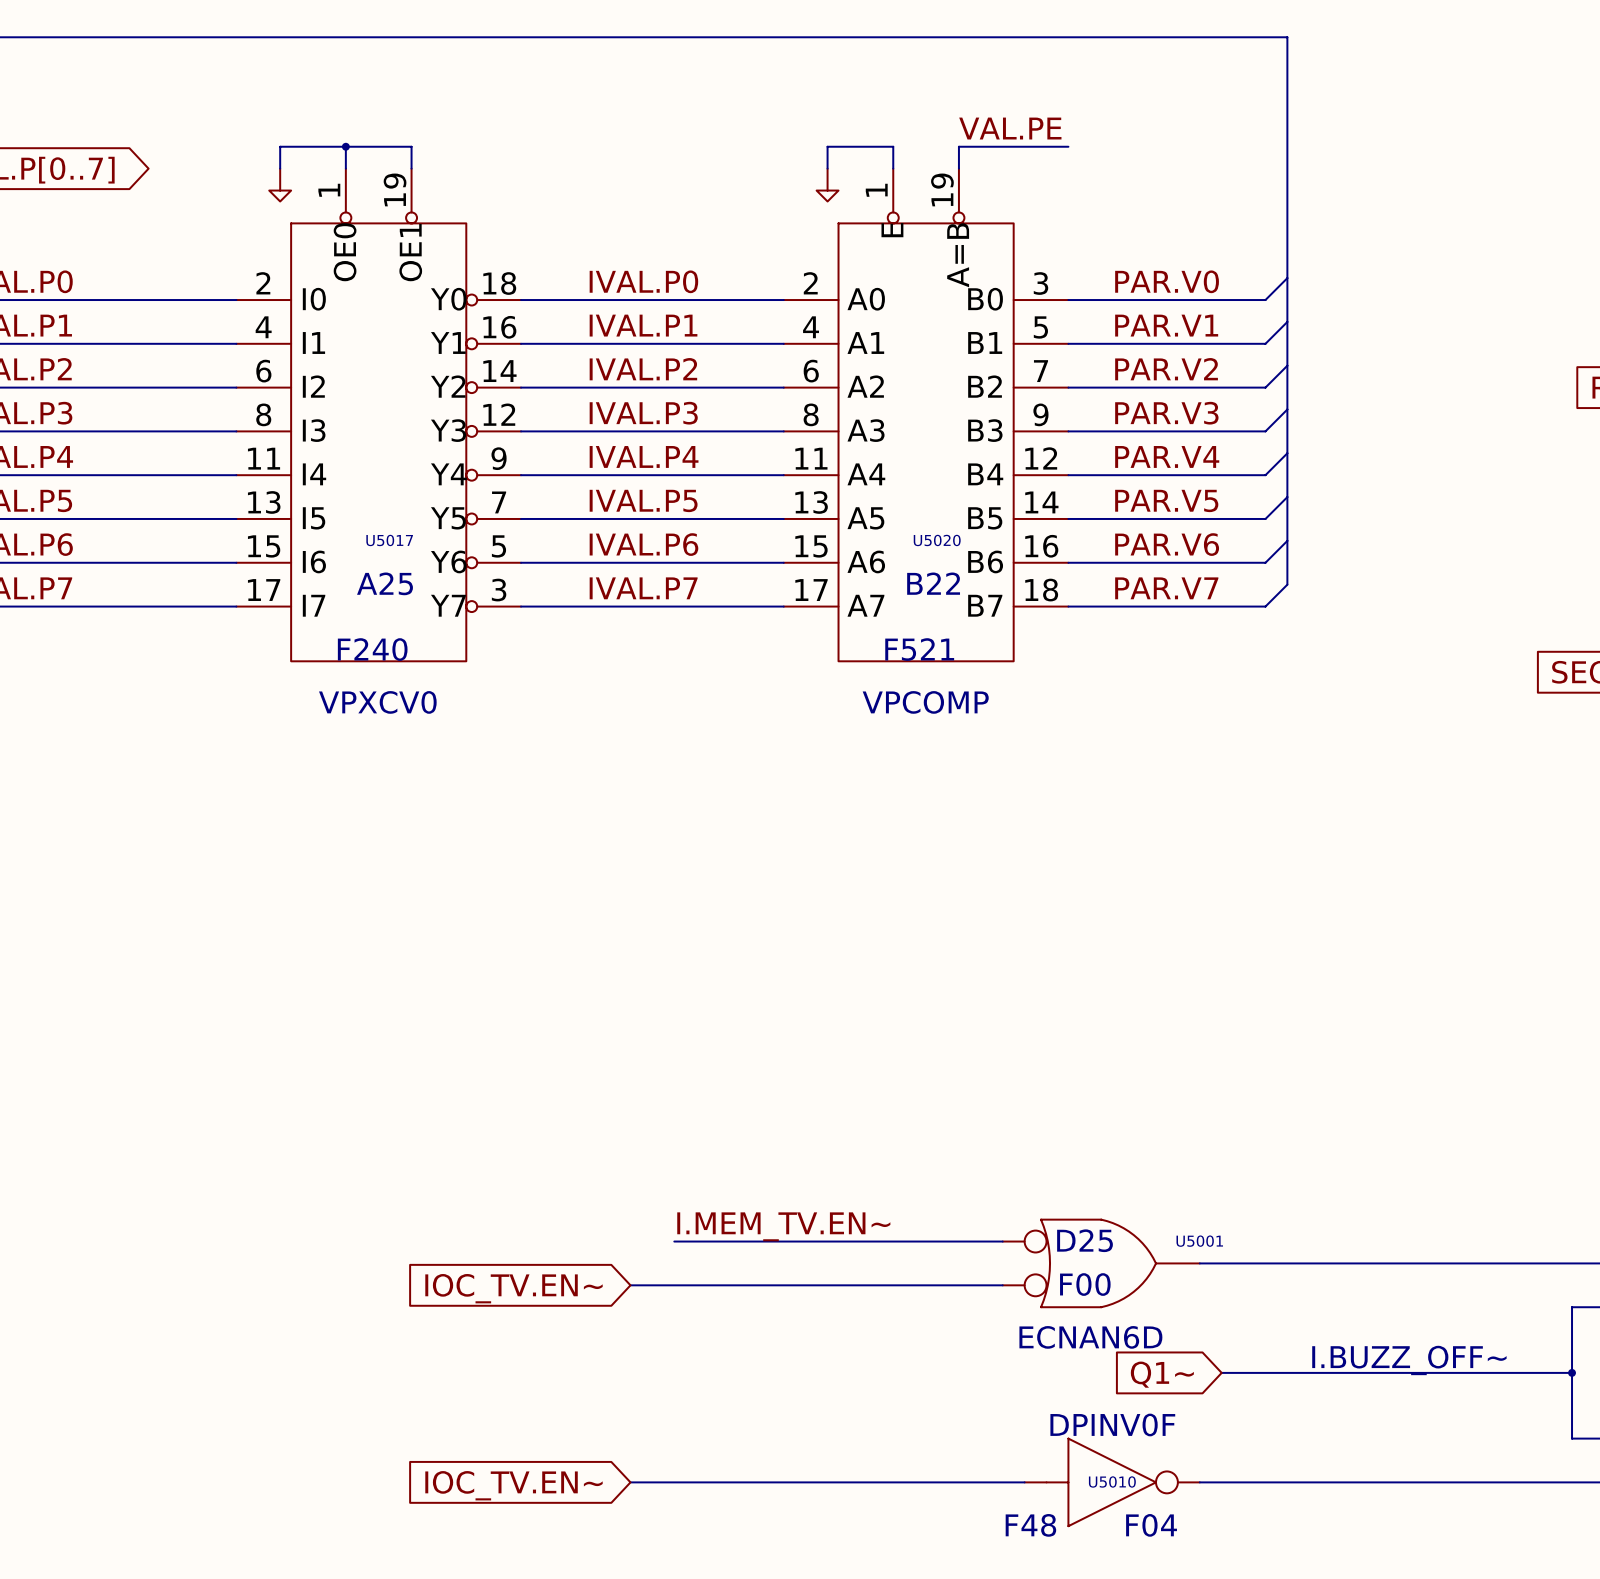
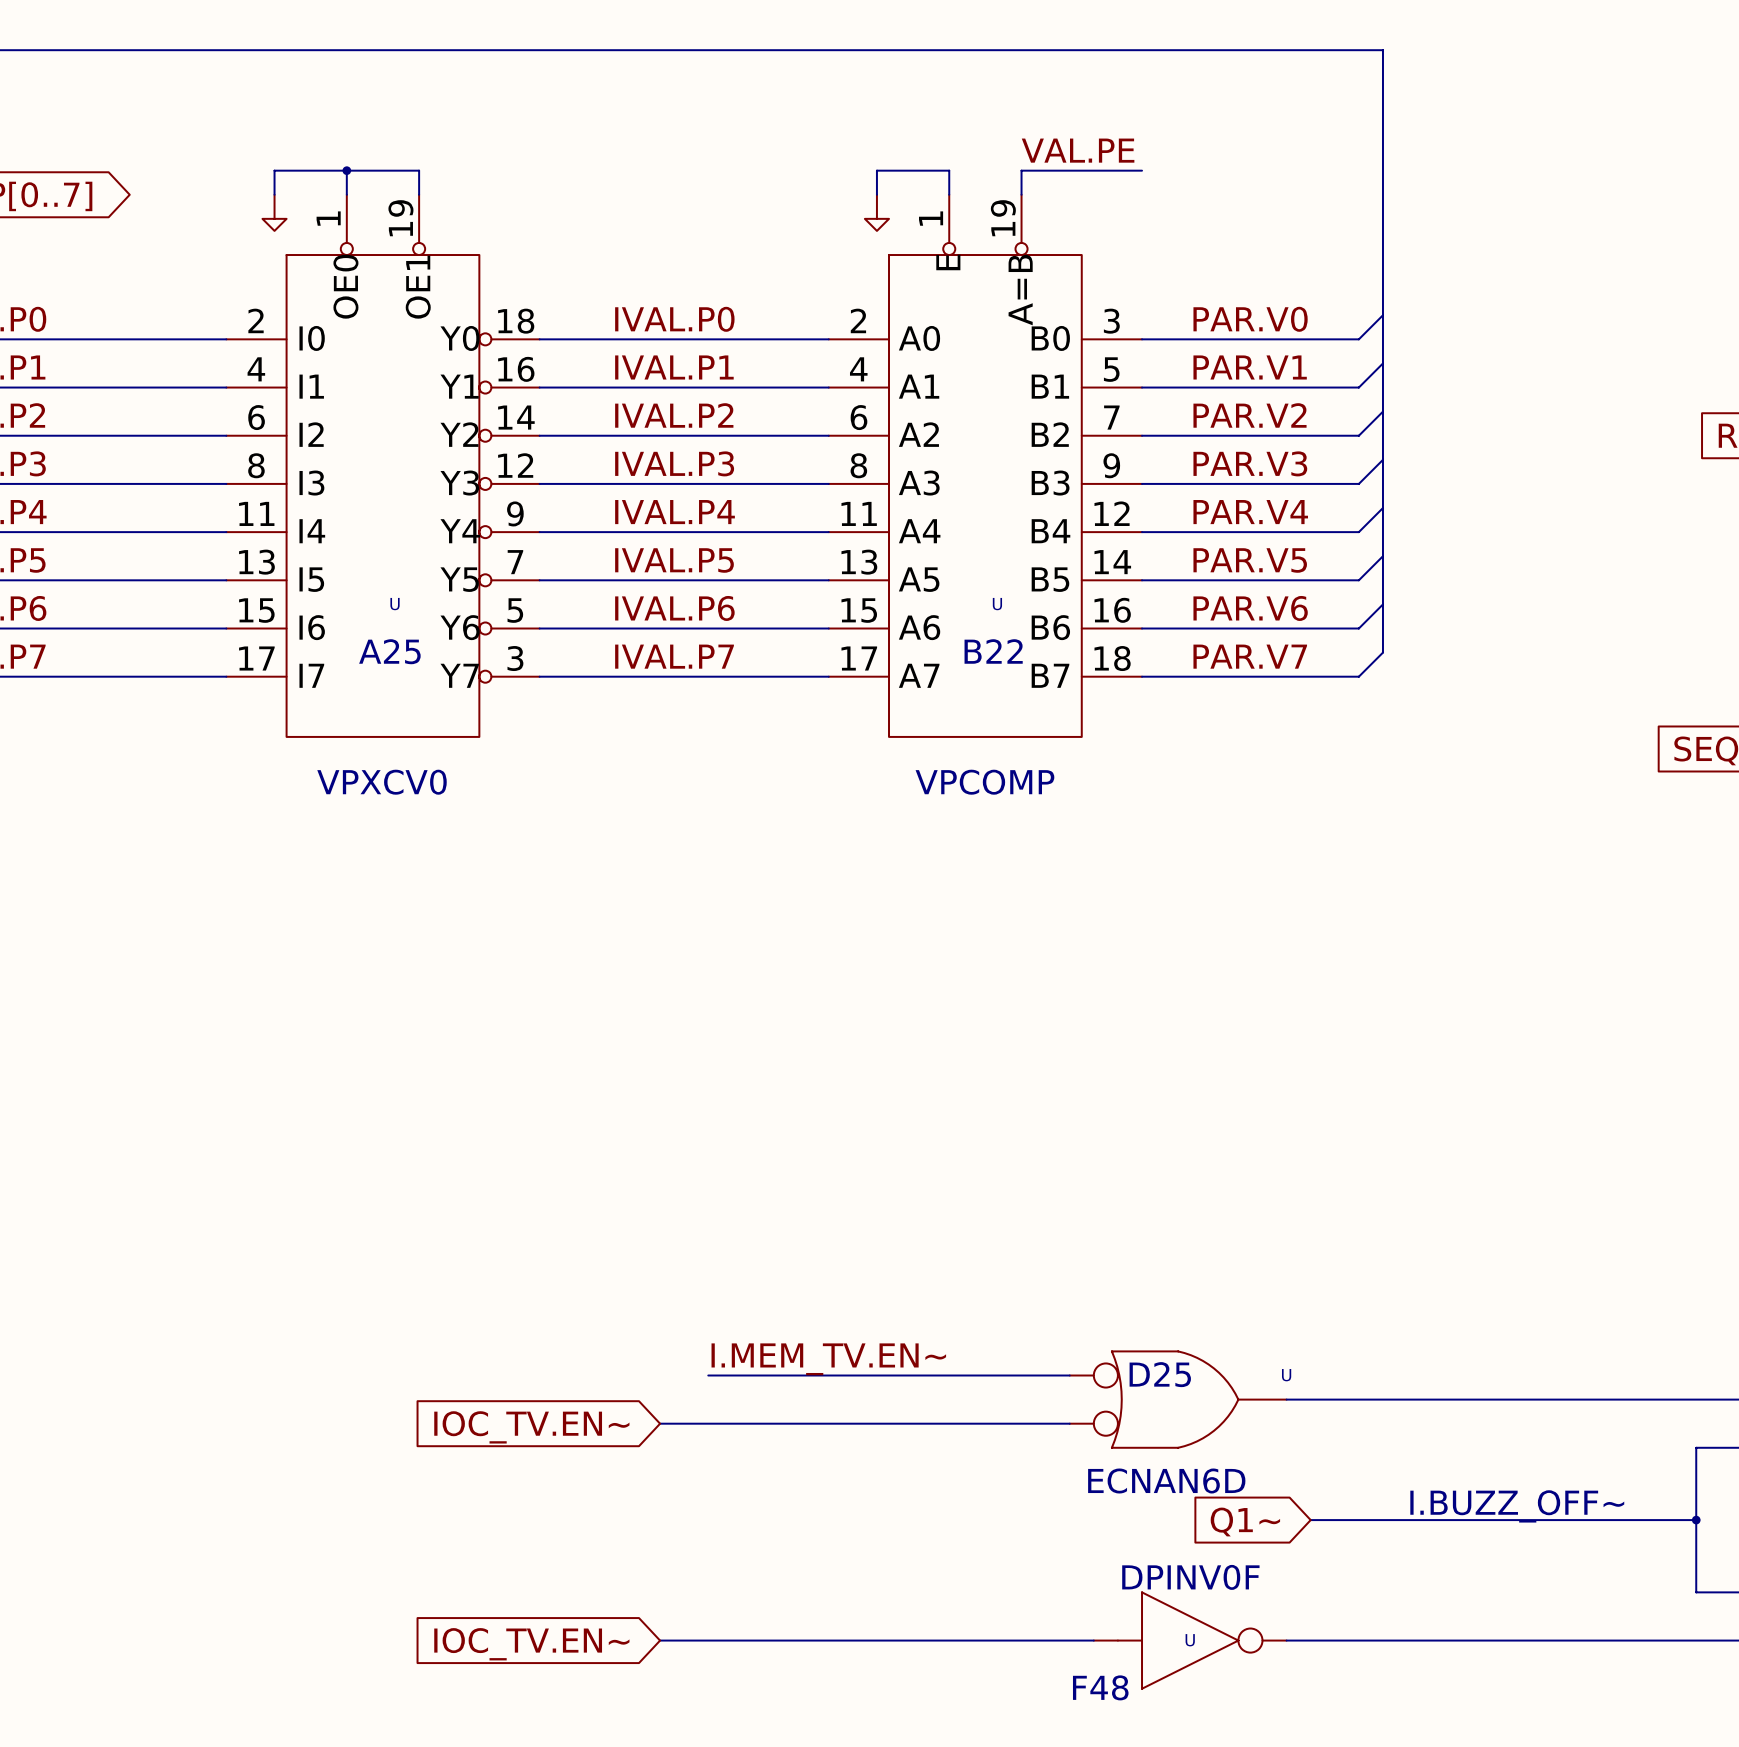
U5017 name: U5017 (389, 540) -> U (395, 604)
U5020 name: U5020 (937, 540) -> U (997, 604)
U5017 value: F240 (372, 649) -> none
U5020 value: F521 (919, 649) -> none
U5001 name: U5001 (1199, 1241) -> U (1286, 1375)
U5001 value: F00 (1085, 1284) -> none
U5010 name: U5010 (1112, 1481) -> U (1190, 1640)
U5010 value: F04 (1151, 1525) -> none

